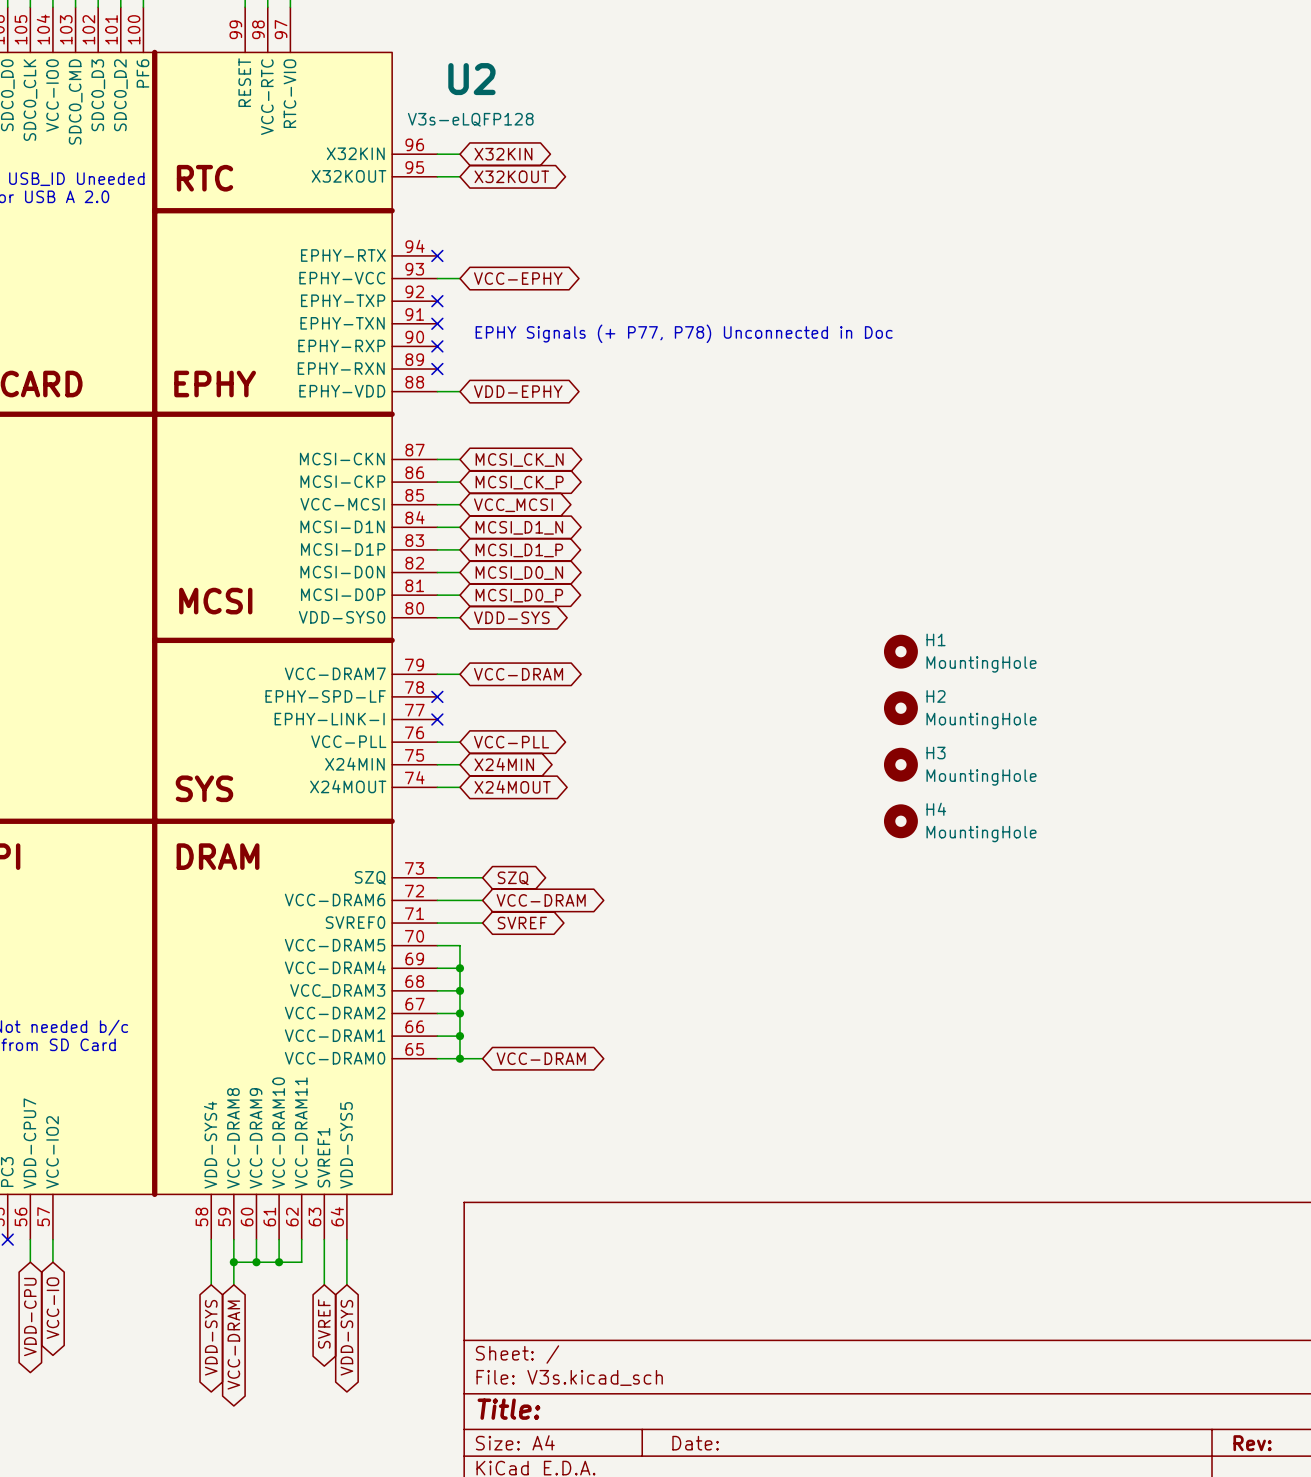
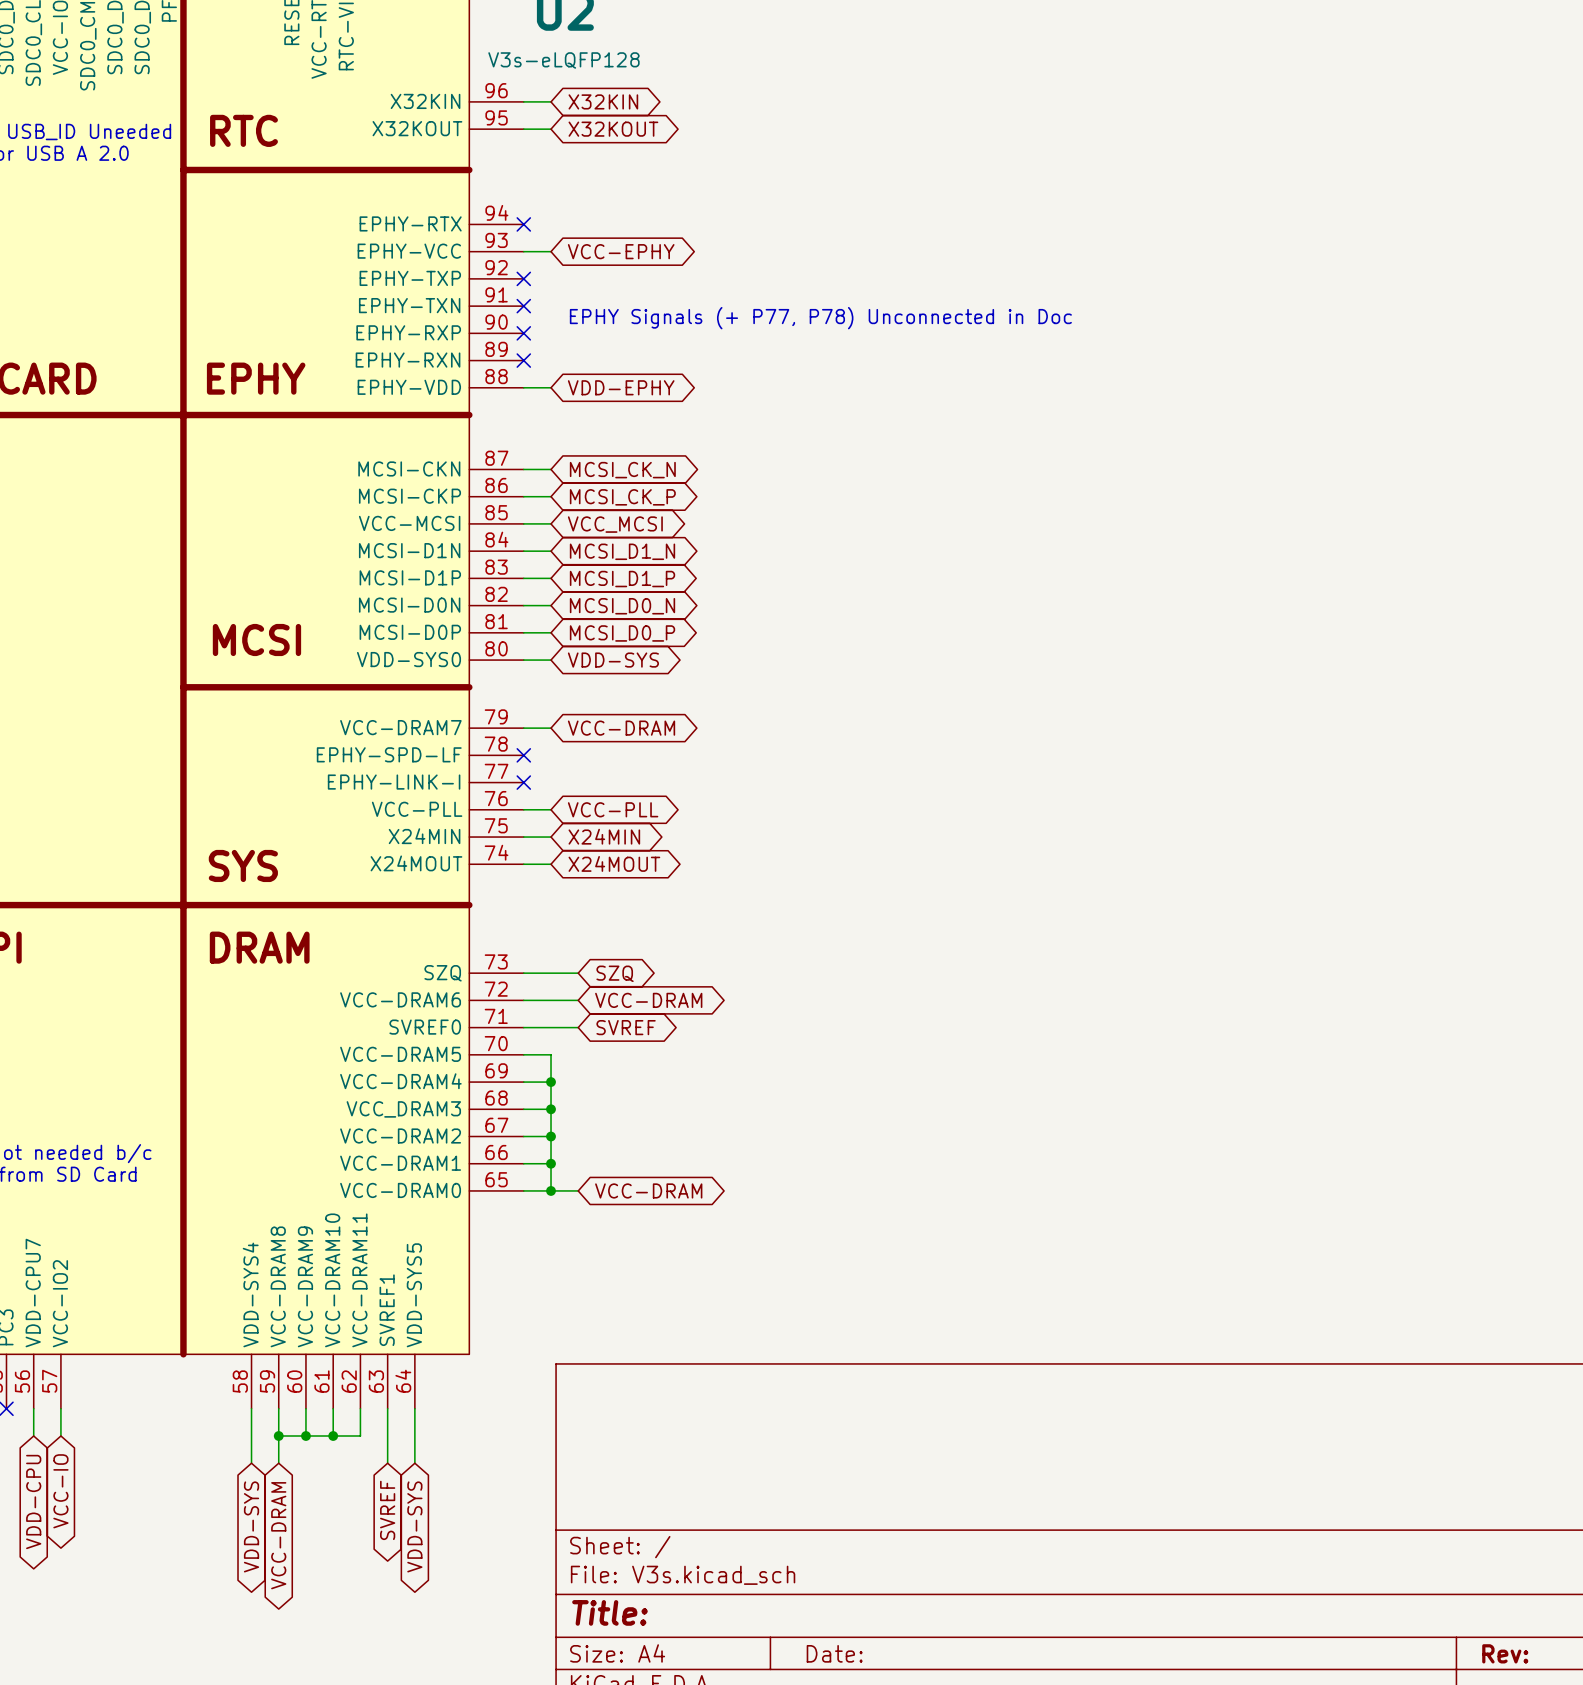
H1: MountingHole (900, 651) -> none
H2: MountingHole (900, 708) -> none
H3: MountingHole (900, 764) -> none
H4: MountingHole (900, 821) -> none

